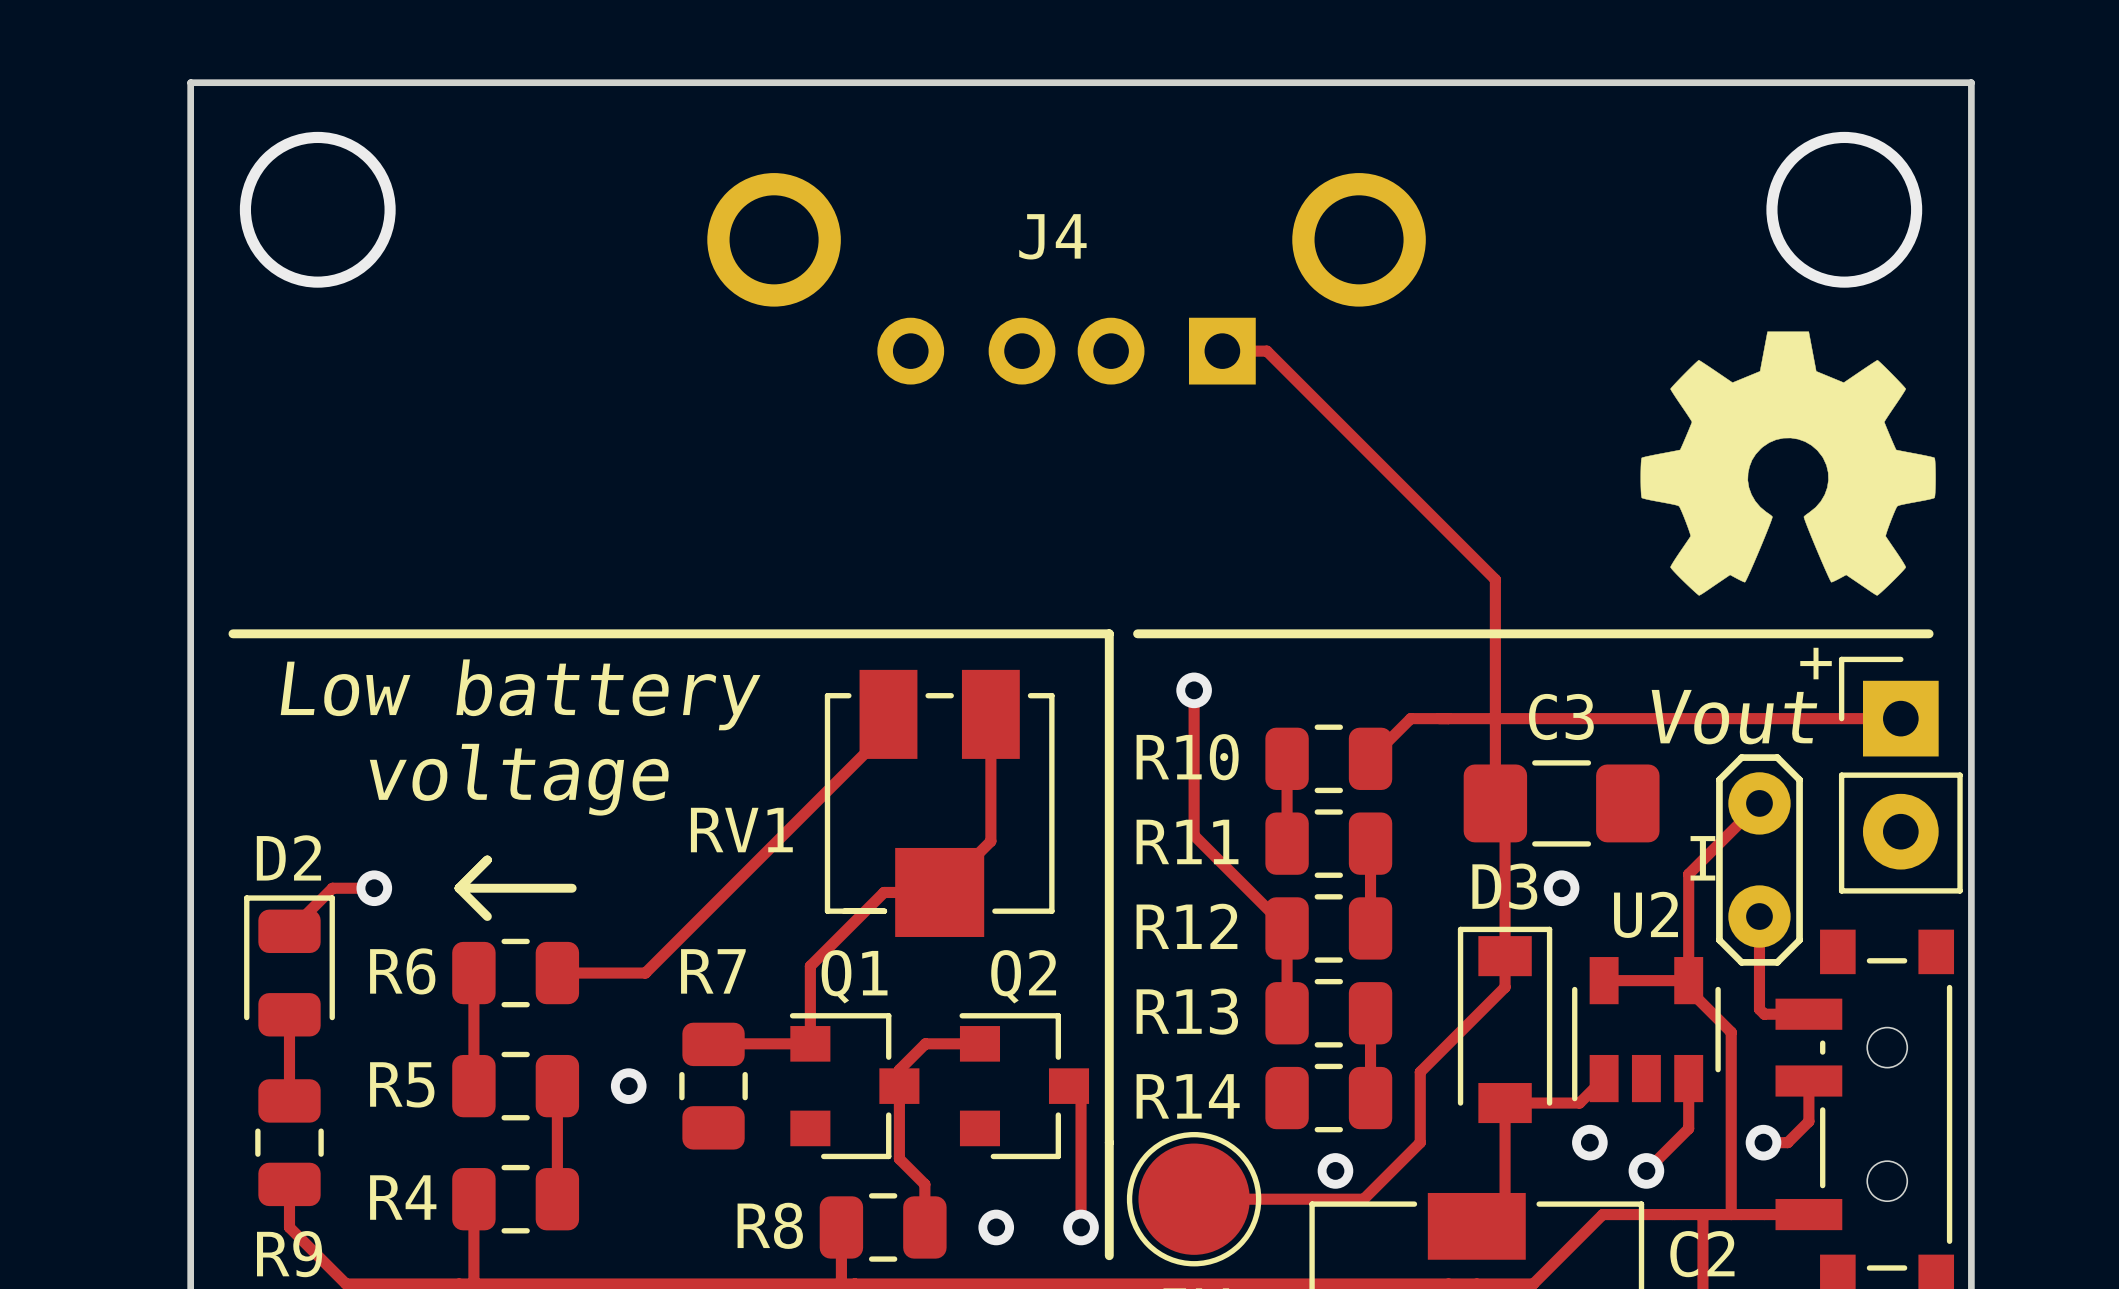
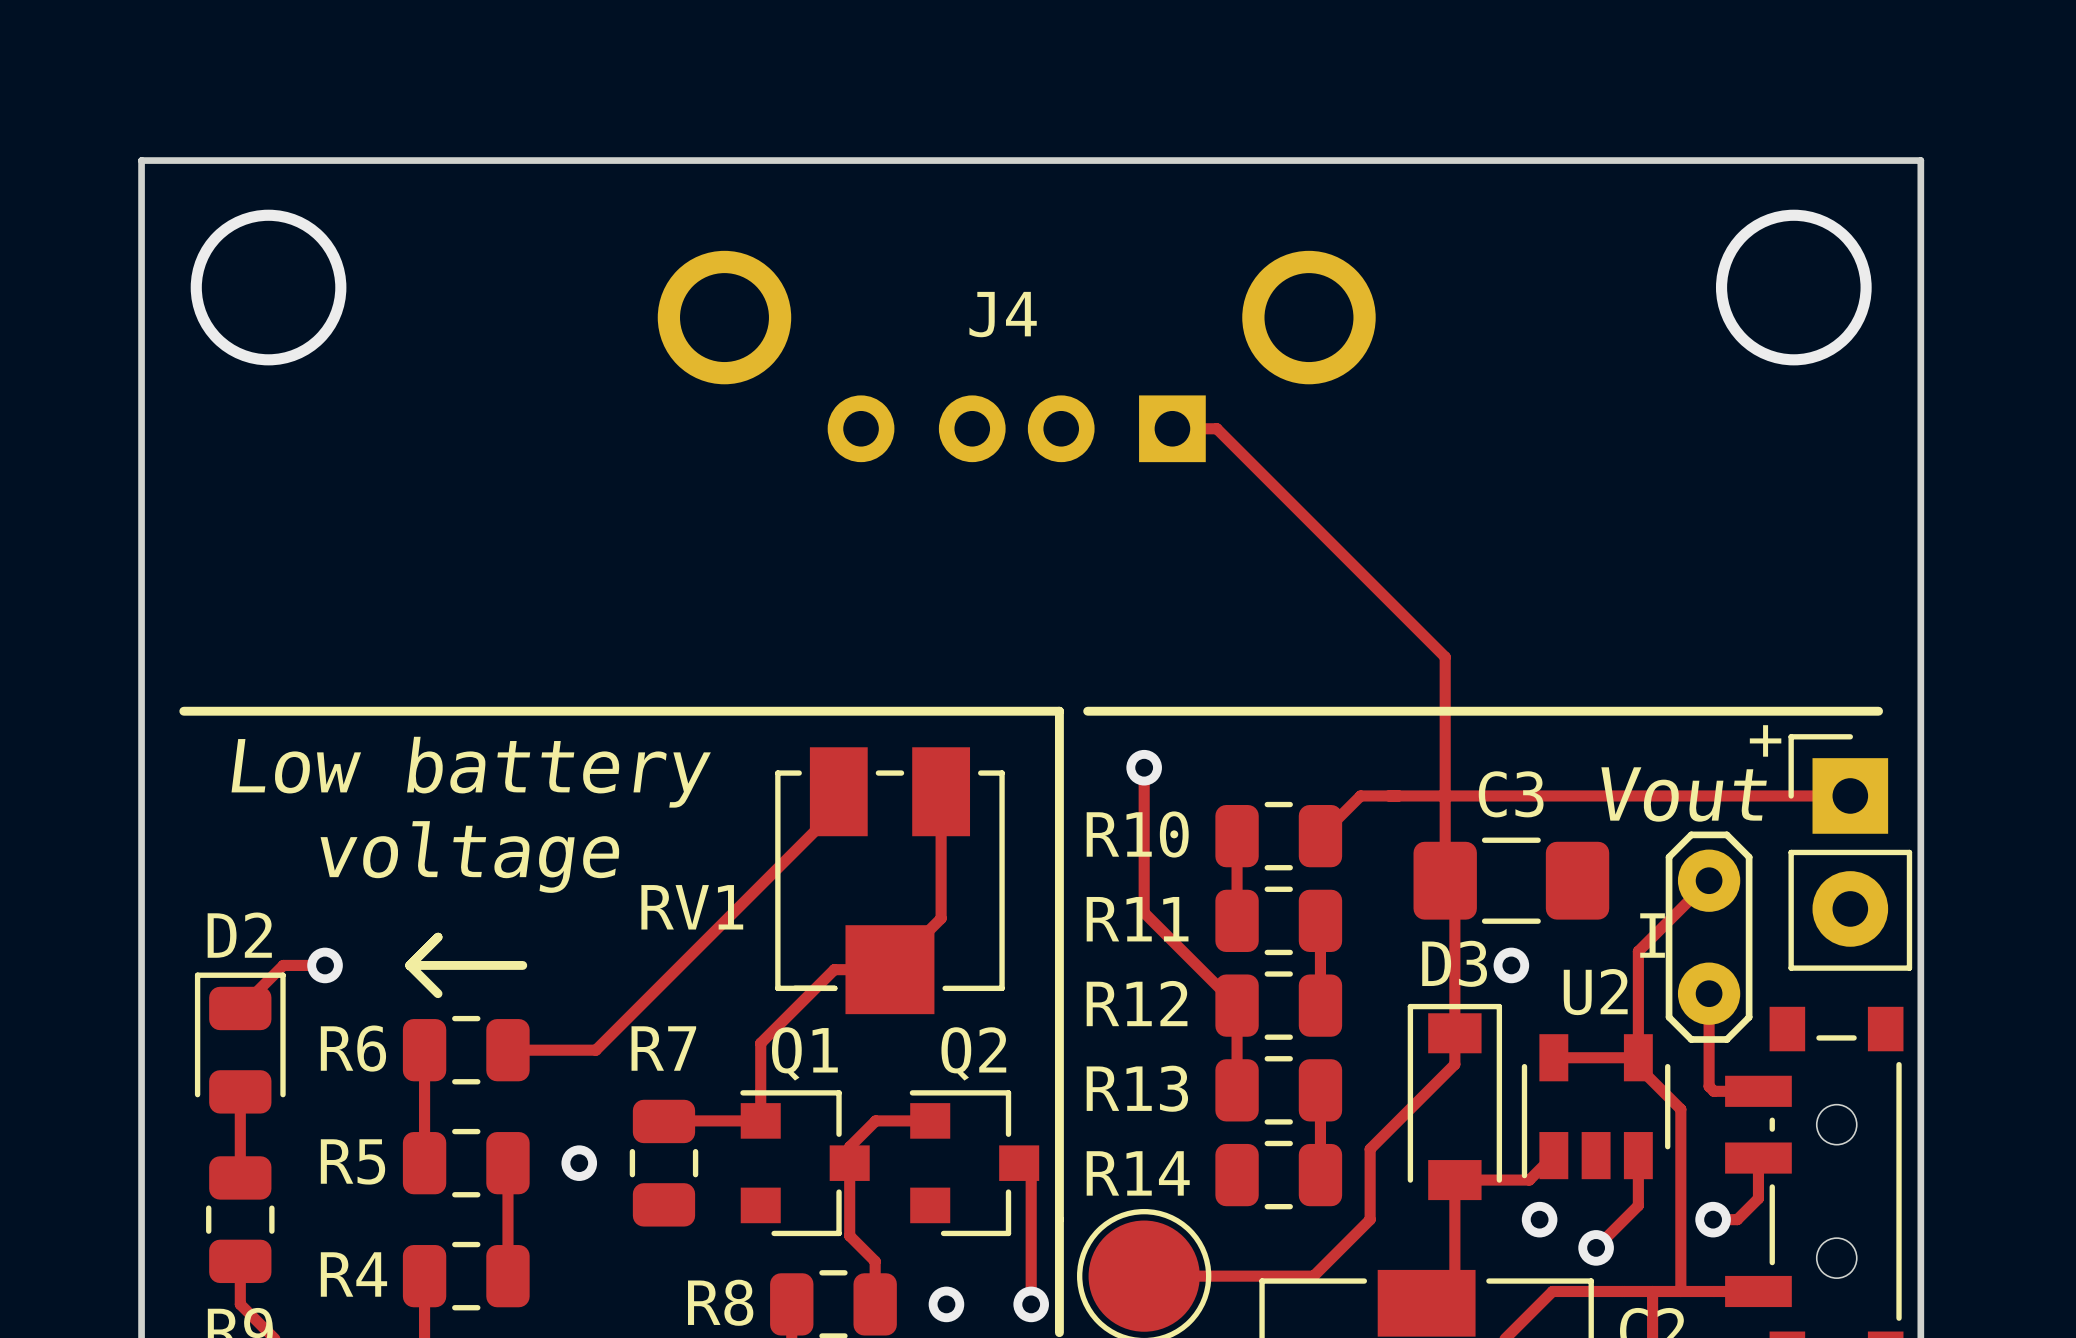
drawing: [1640, 331, 1936, 596] -> none
via: (1335, 1170) -> none

